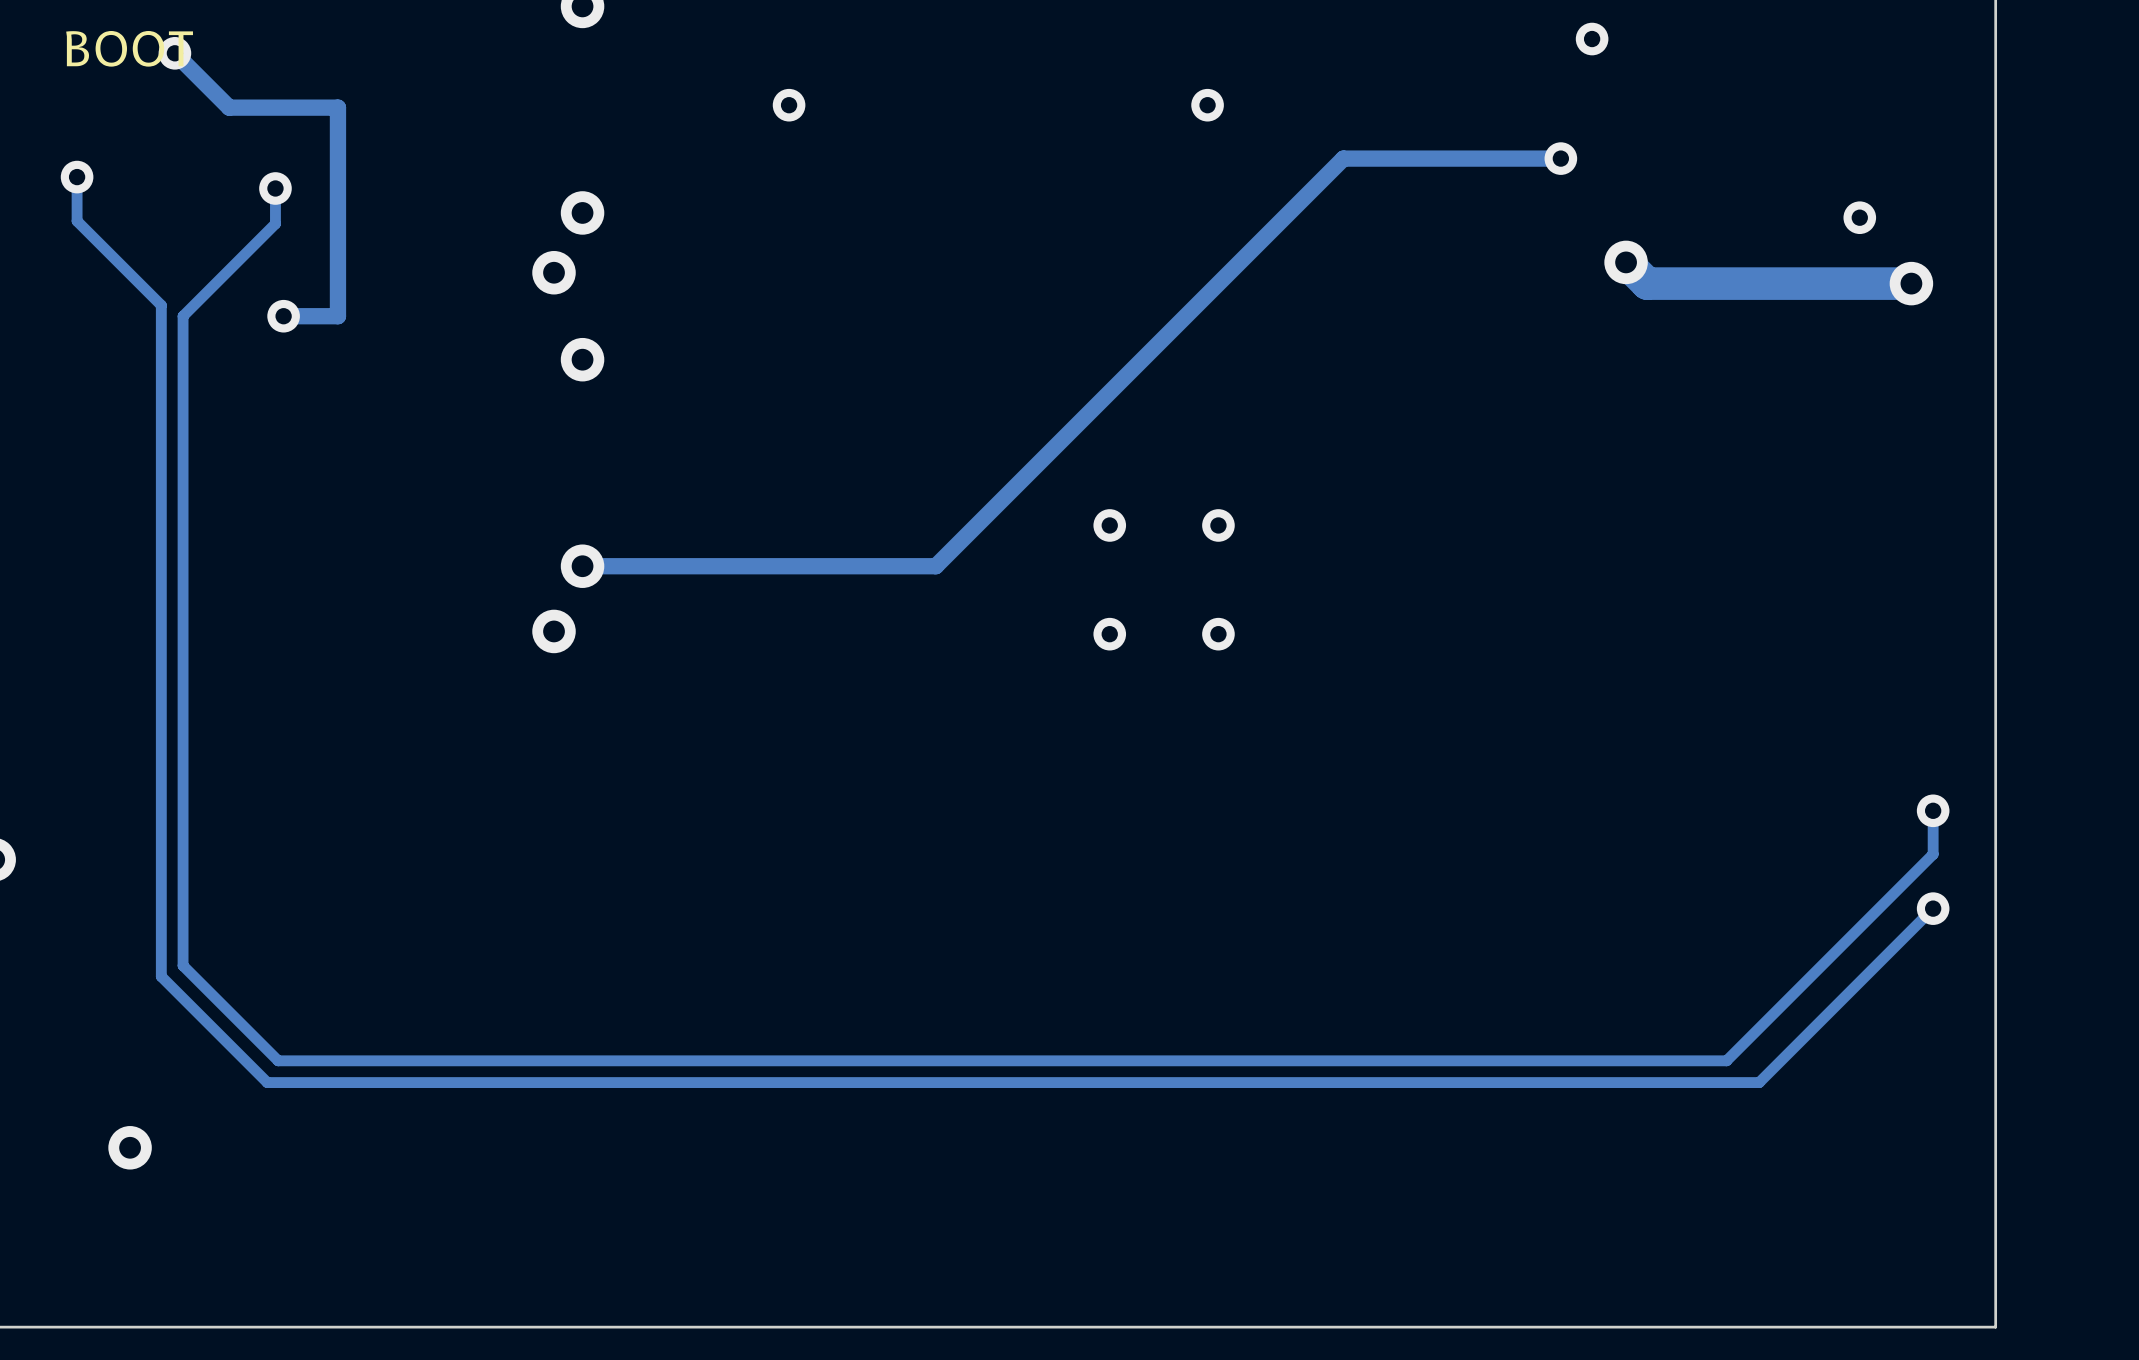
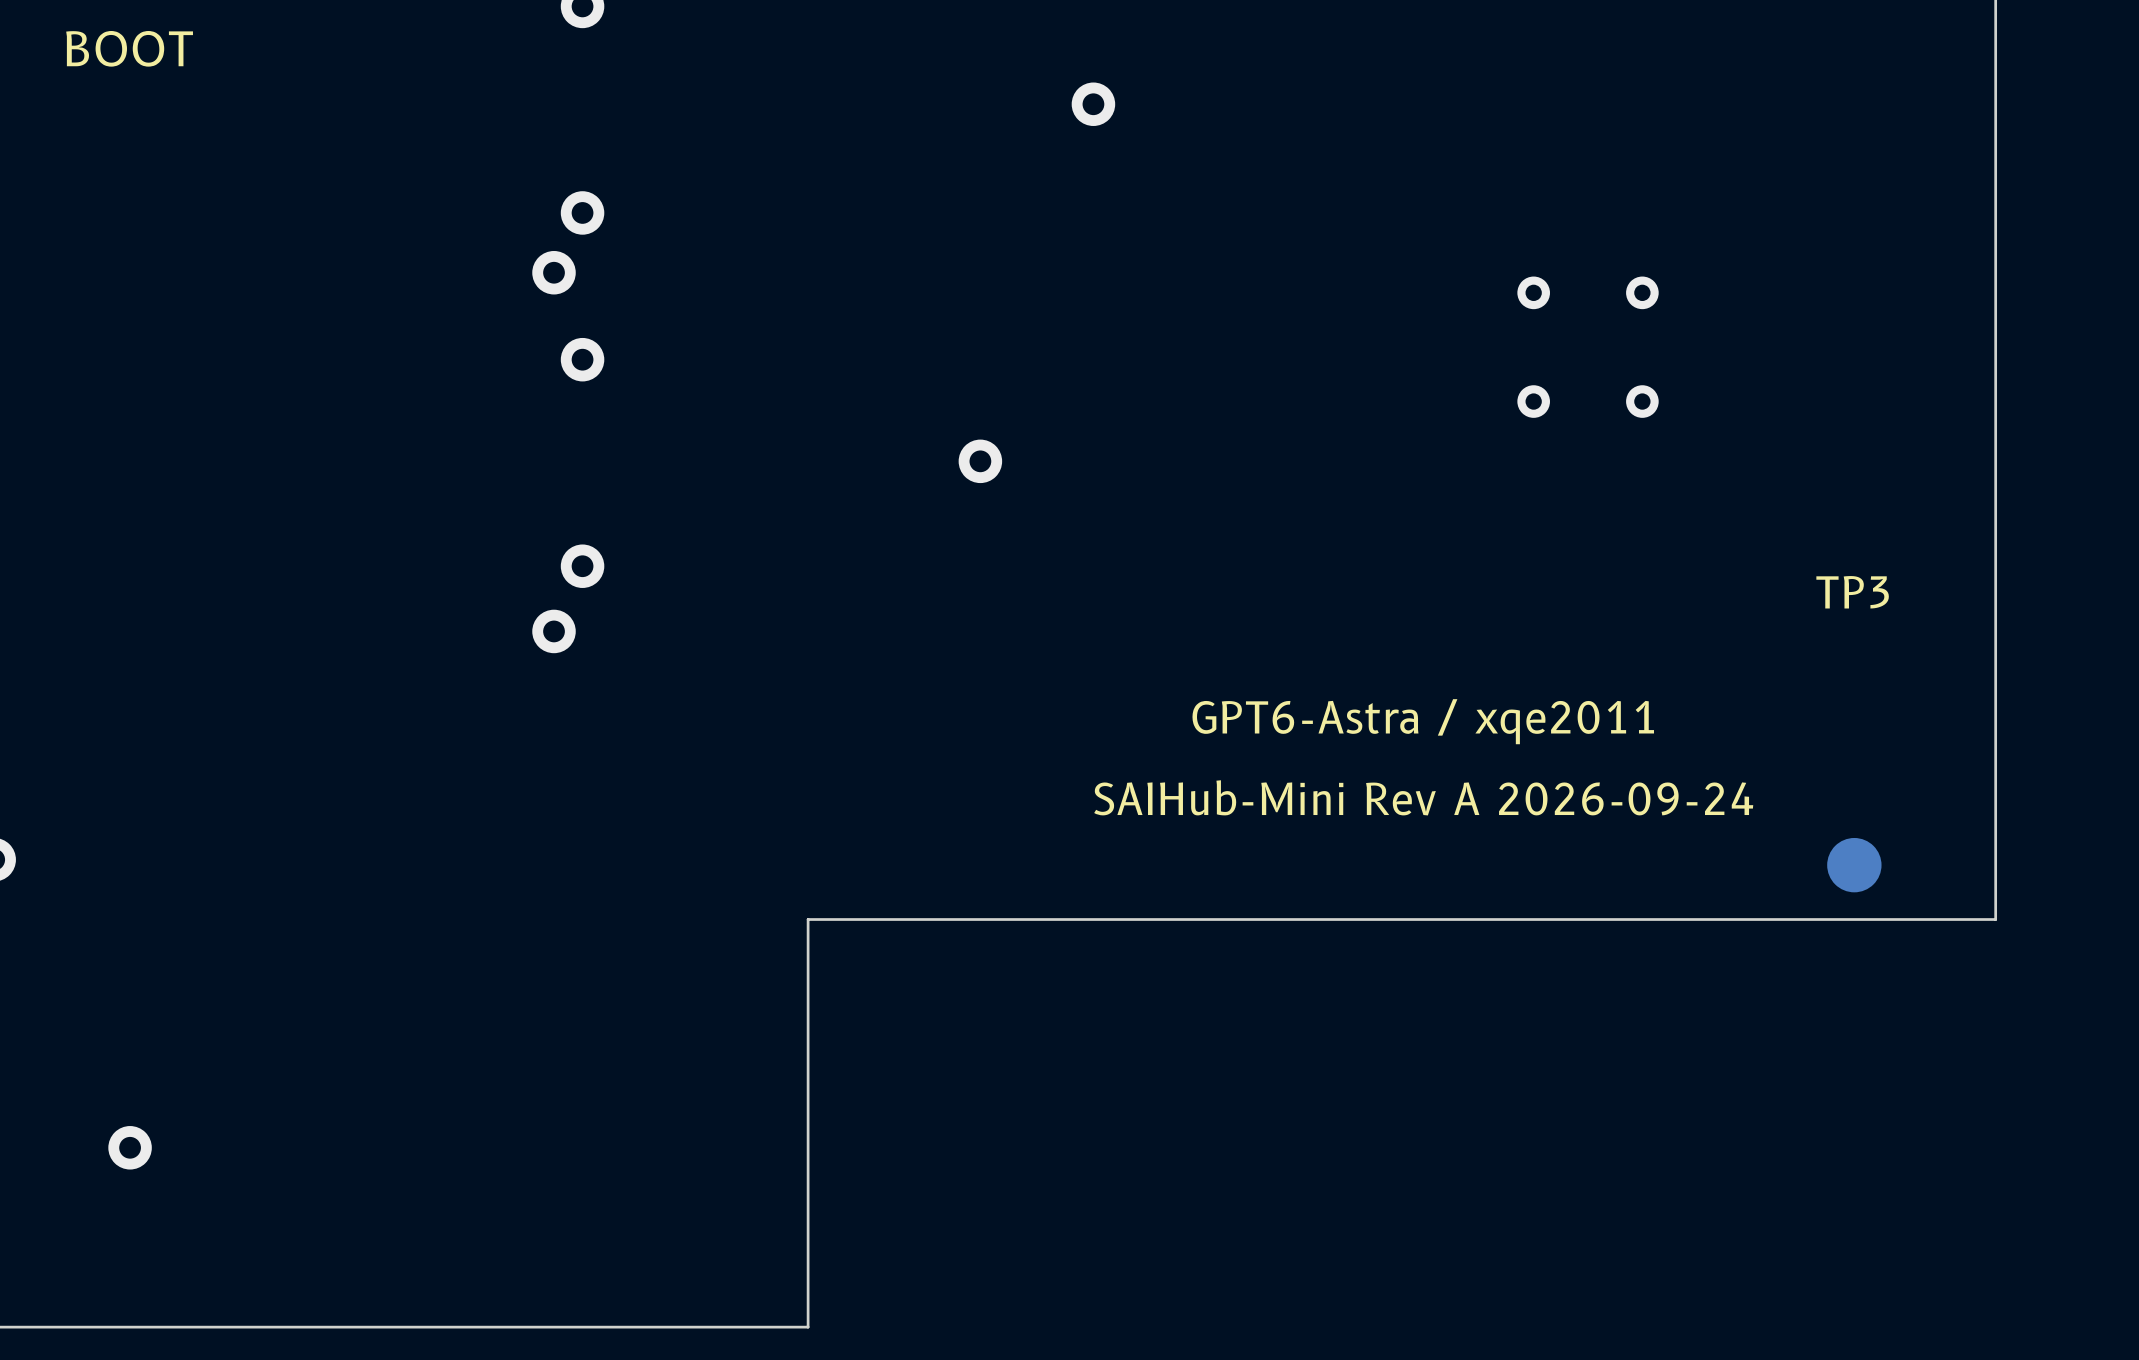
via: (1592, 39) -> none
track: (174, 53) (229, 107) (337, 107) (337, 316) (283, 316) -> none
via: (174, 53) -> none
via: none -> (1093, 104)
via: (789, 105) -> none
via: (1207, 105) -> none
track: (1560, 158) (1343, 158) (935, 566) (582, 566) -> none
via: (1560, 158) -> none
track: (77, 177) (77, 221) (161, 305) (161, 976) (267, 1082) (1759, 1082) (1933, 908) -> none
via: (77, 177) -> none
track: (275, 188) (275, 223) (183, 316) (183, 965) (278, 1060) (1726, 1060) (1933, 854) (1933, 810) -> none
via: (275, 188) -> none
via: (1859, 217) -> none
track: (1626, 262) (1647, 283) (1911, 283) -> none
via position: (1626, 262) -> (1642, 292)
via: (1911, 283) -> none
via: none -> (1533, 292)
via: (283, 316) -> none
via: none -> (1533, 401)
via: none -> (1642, 401)
via: none -> (980, 461)
via: (1109, 525) -> none
via: (1218, 525) -> none
via: (1109, 634) -> none
via: (1218, 634) -> none
text: none -> GPT6-Astra / xqe2011 (1423, 721)
text: none -> SAIHub-Mini Rev A 2026-09-24 (1423, 797)
via: (1933, 810) -> none
TP3: none -> (1854, 865)
via: (1933, 908) -> none
board edge: (1995, 919) (1995, 1327) (808, 1327) -> (1995, 919) (808, 919) (808, 1327)

